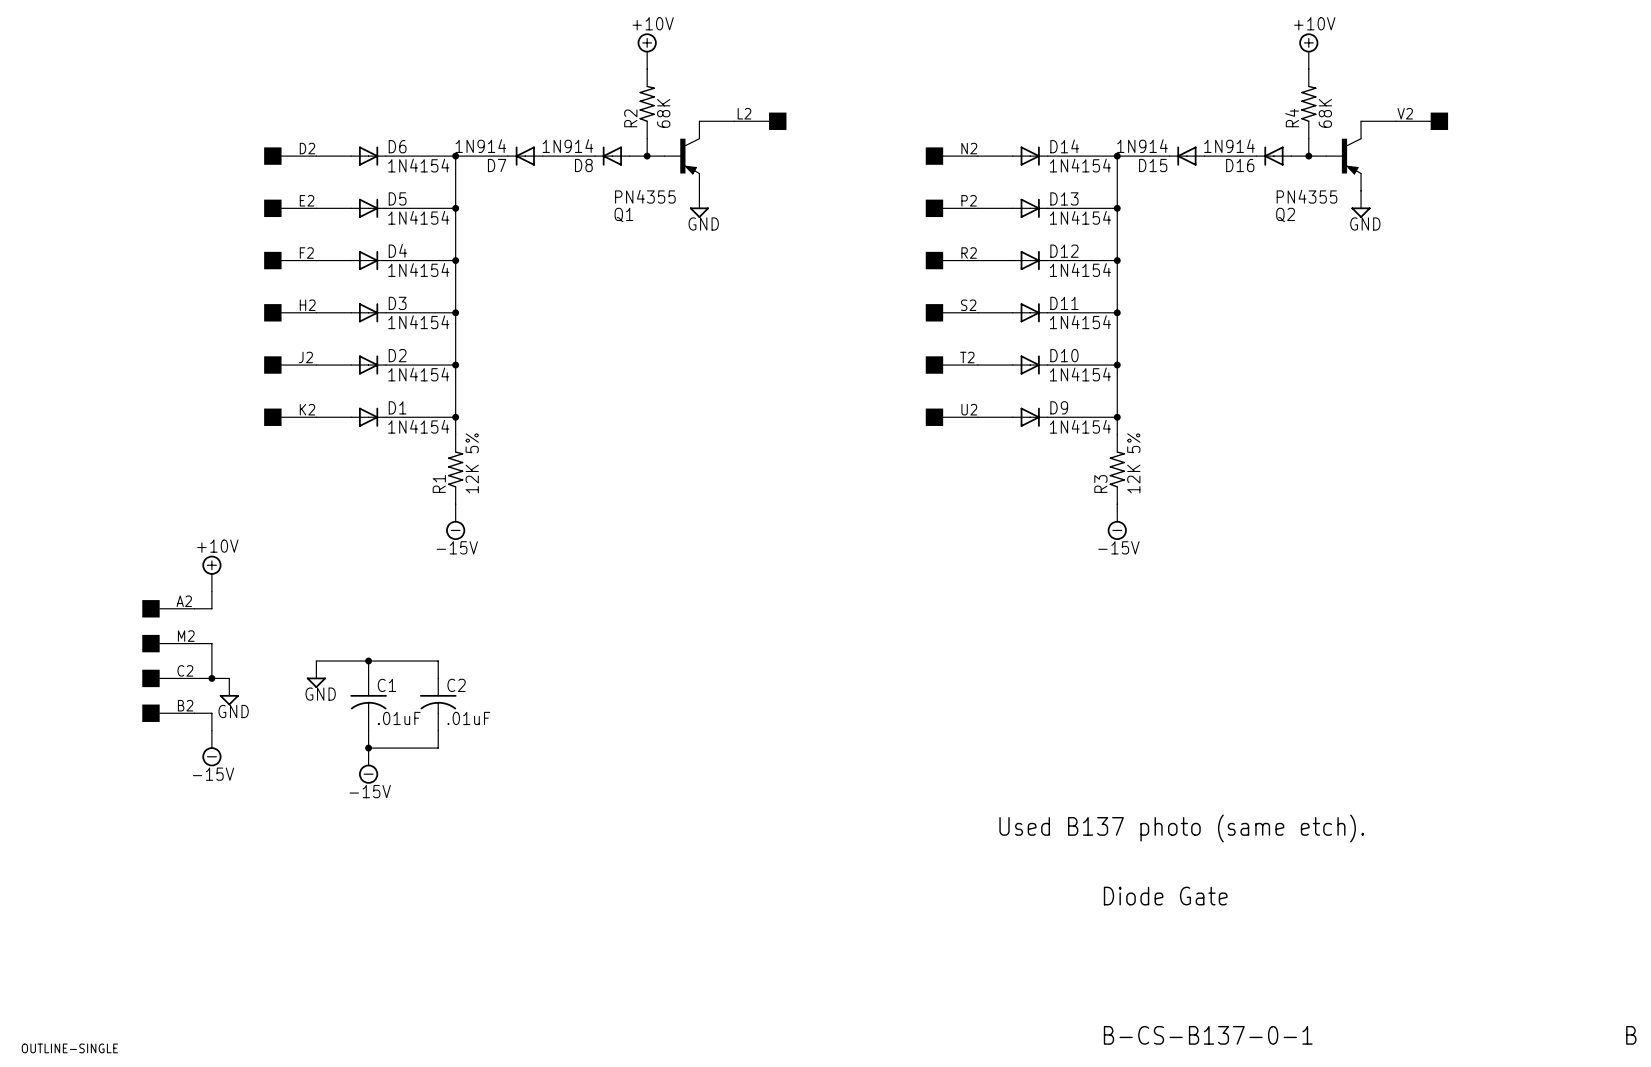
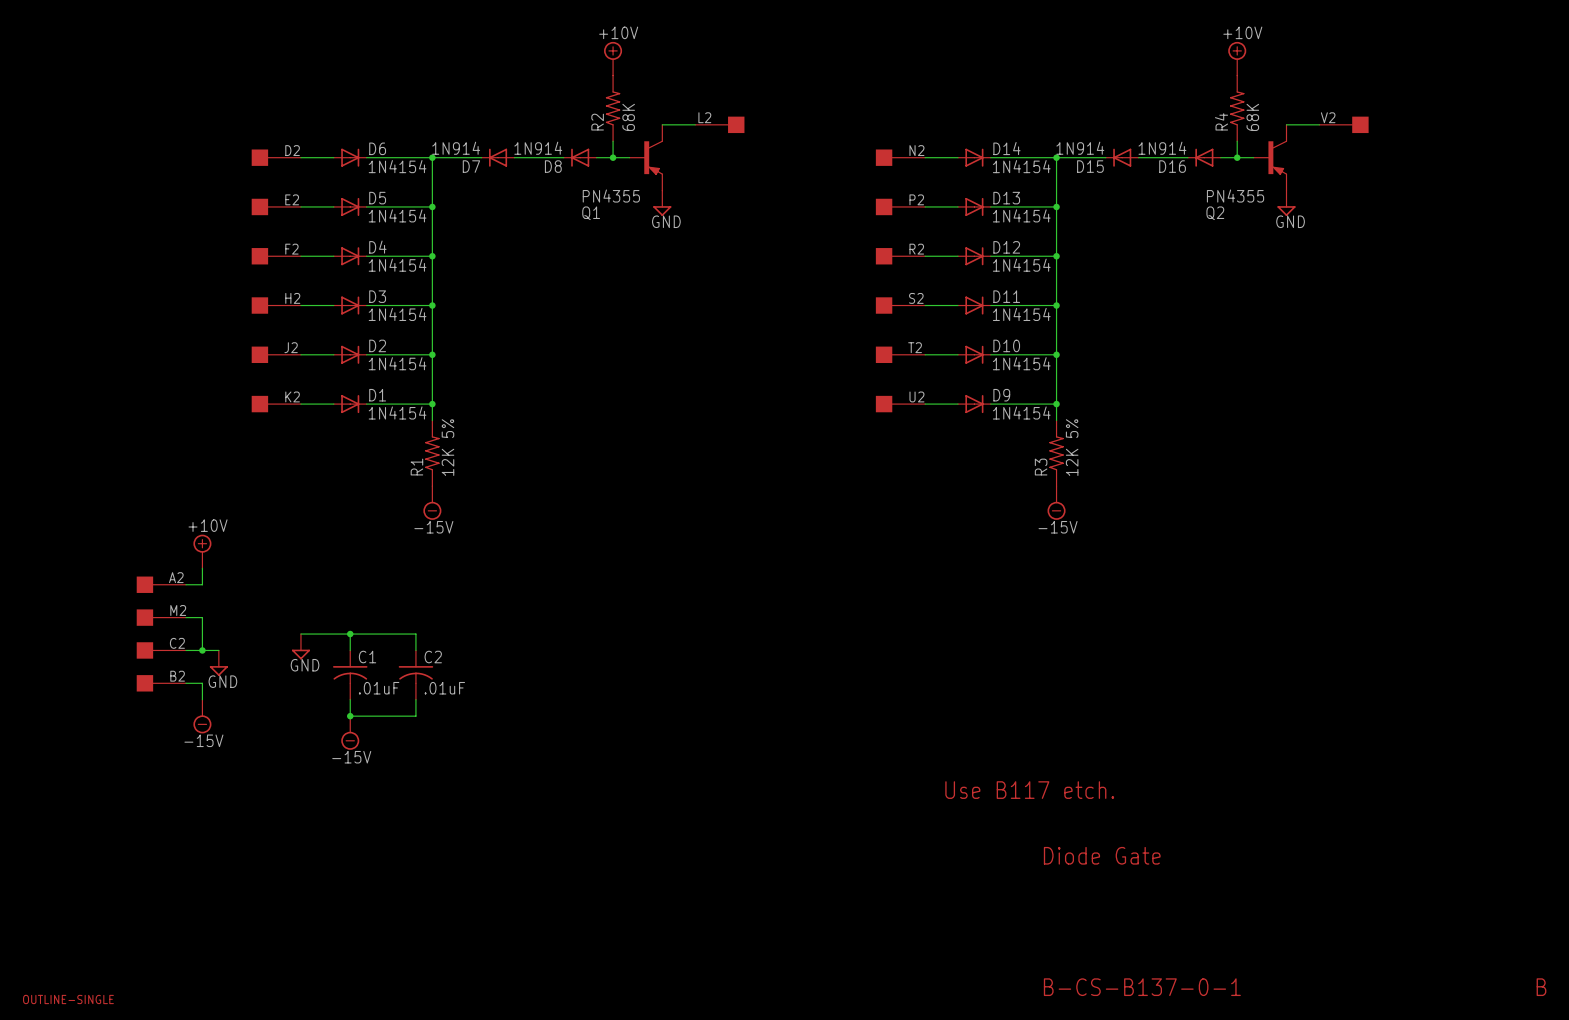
text: Used B137 photo (same etch). (1181, 828) -> Use B117 etch. (1029, 790)

